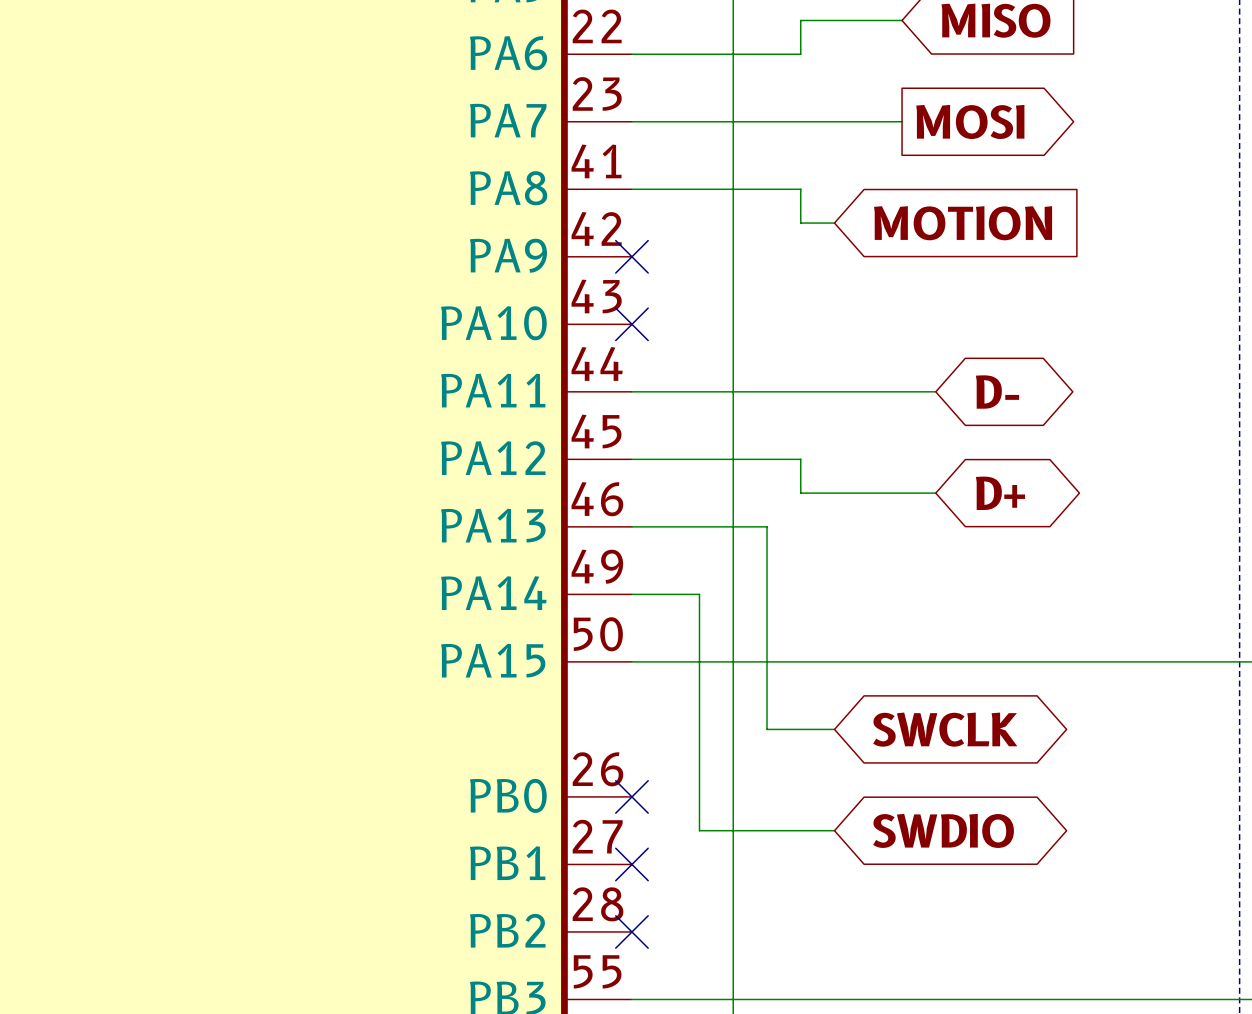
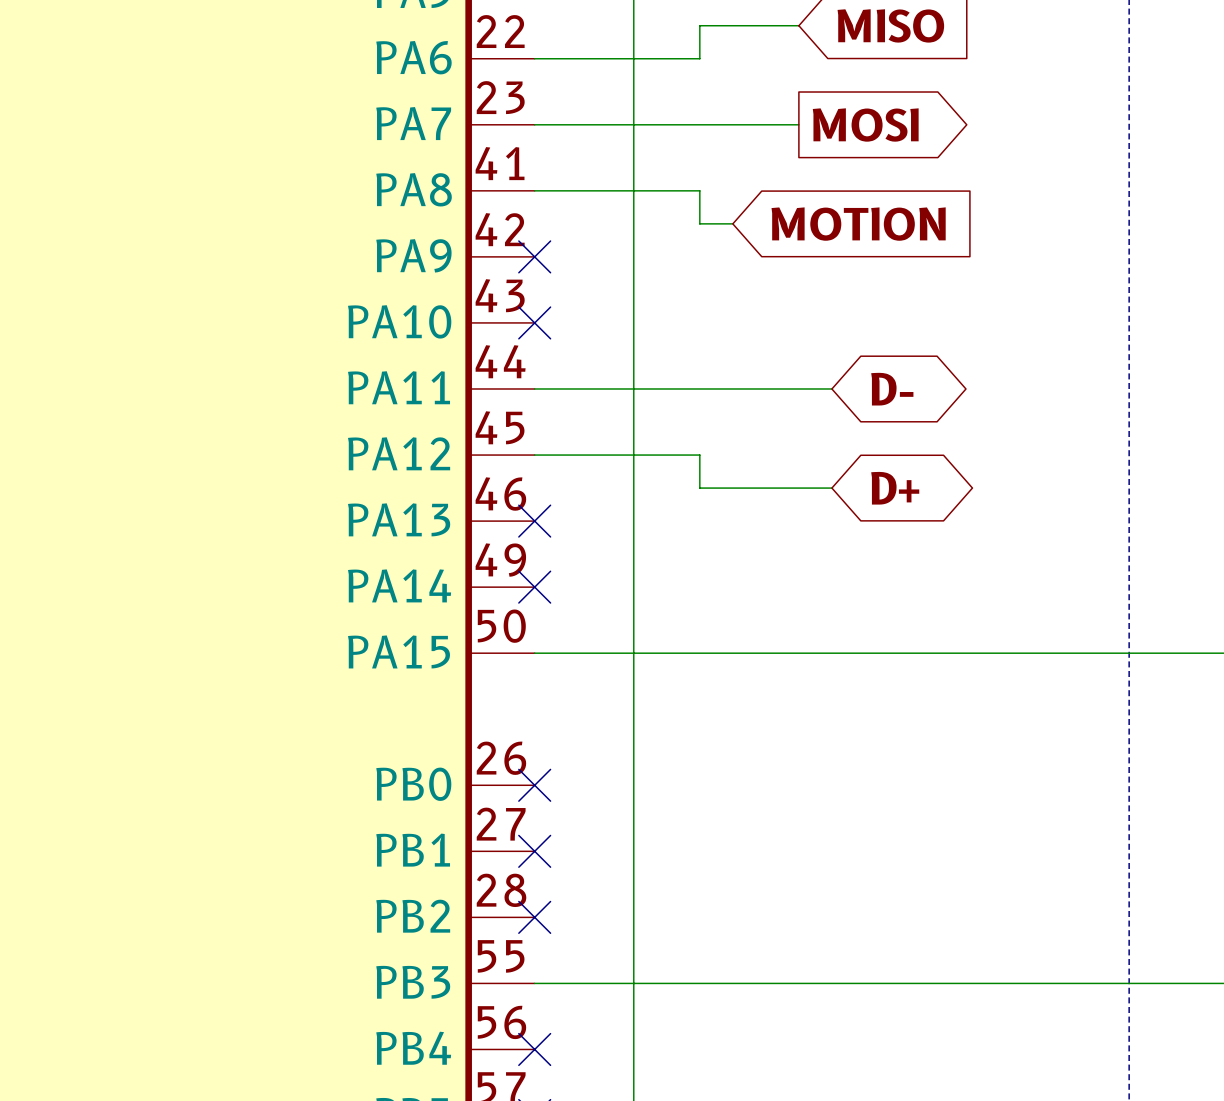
wire: (631, 526) (767, 526) (767, 729) (834, 729) -> none
no-connect mark: none -> (534, 521)
wire: (631, 594) (699, 594) (699, 830) (834, 830) -> none
no-connect mark: none -> (534, 587)
global label: SWCLK (945, 729) -> none
global label: SWDIO (943, 830) -> none

